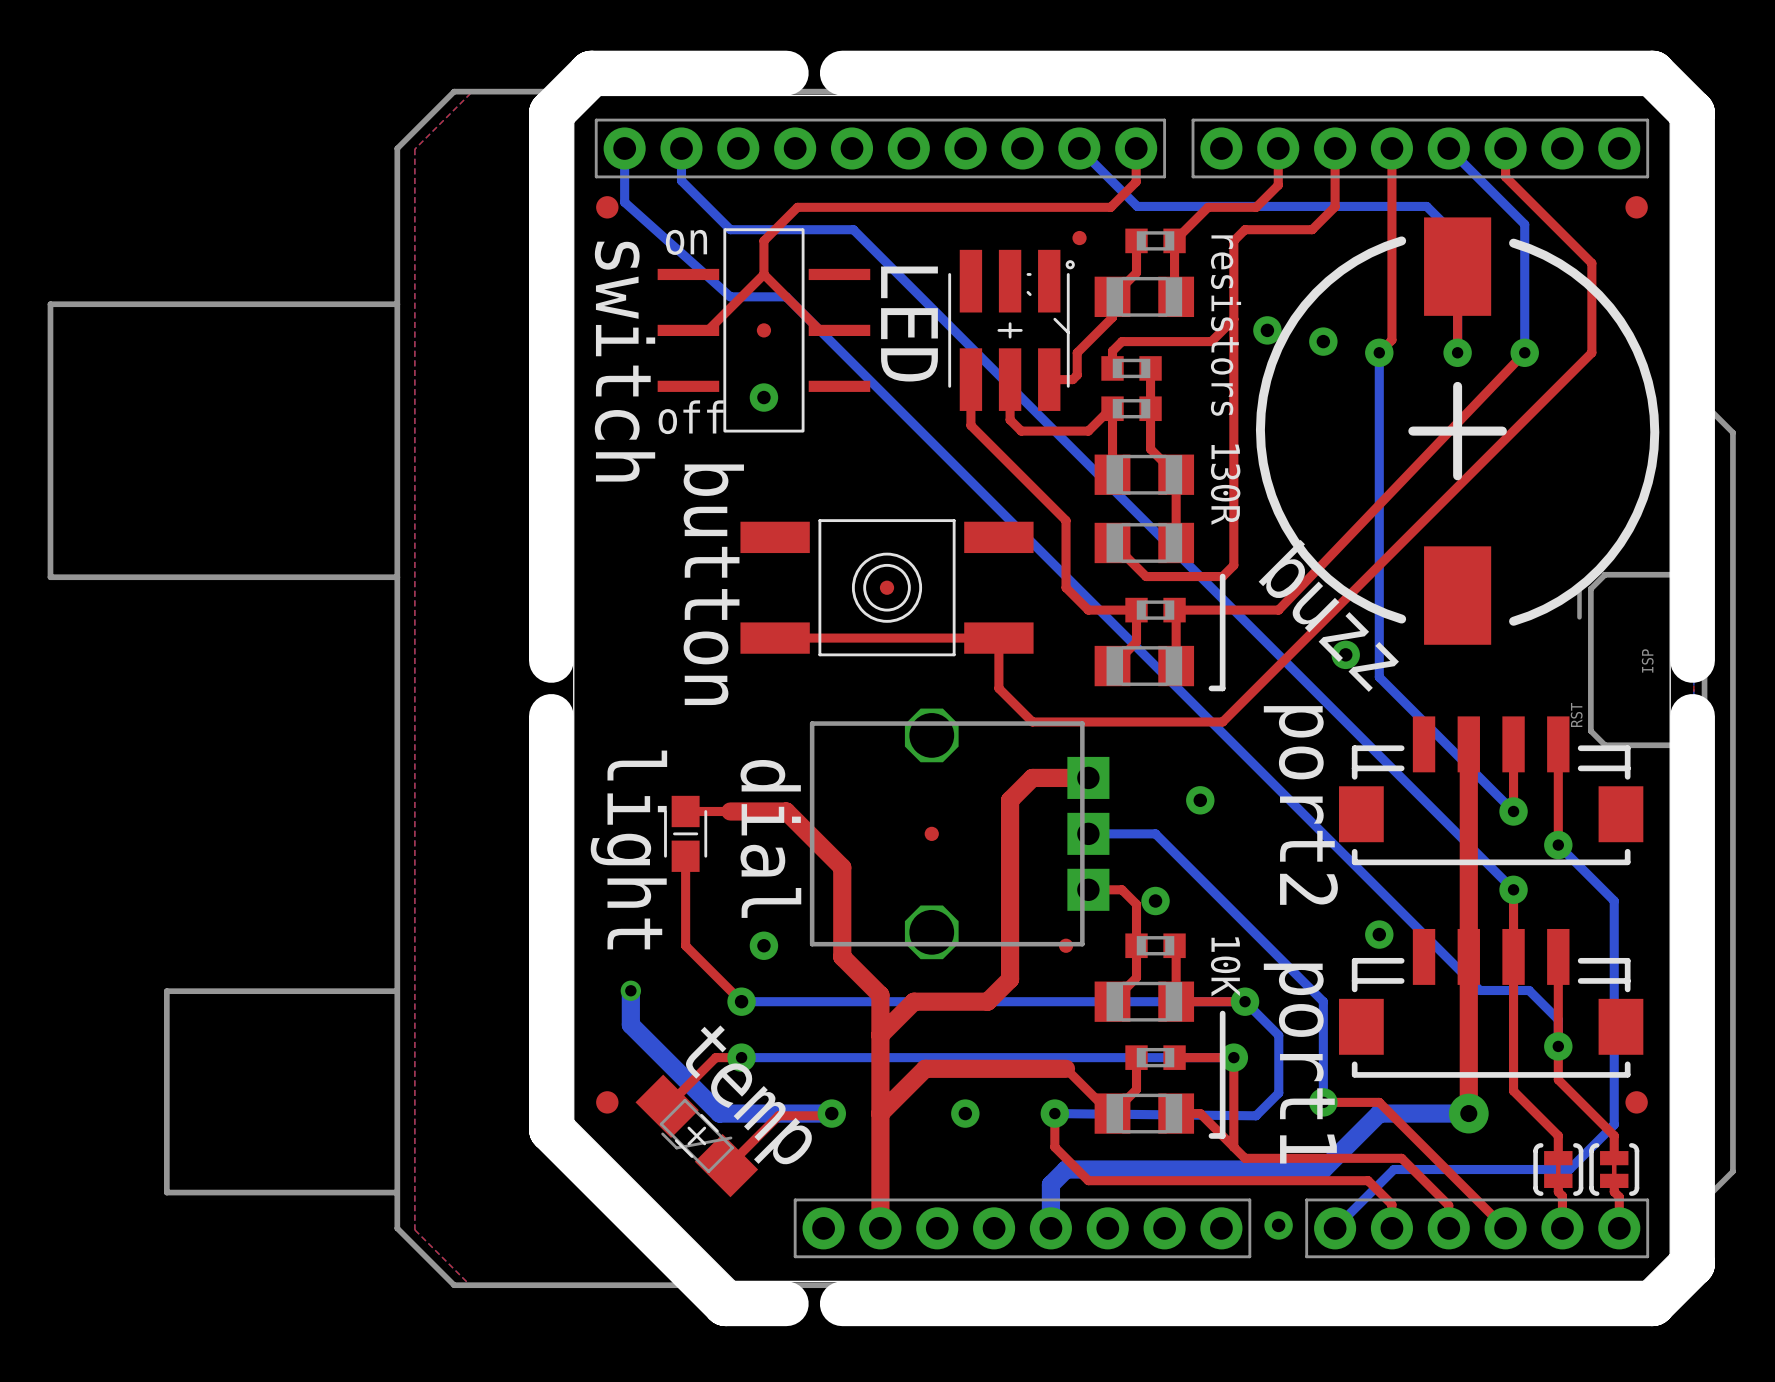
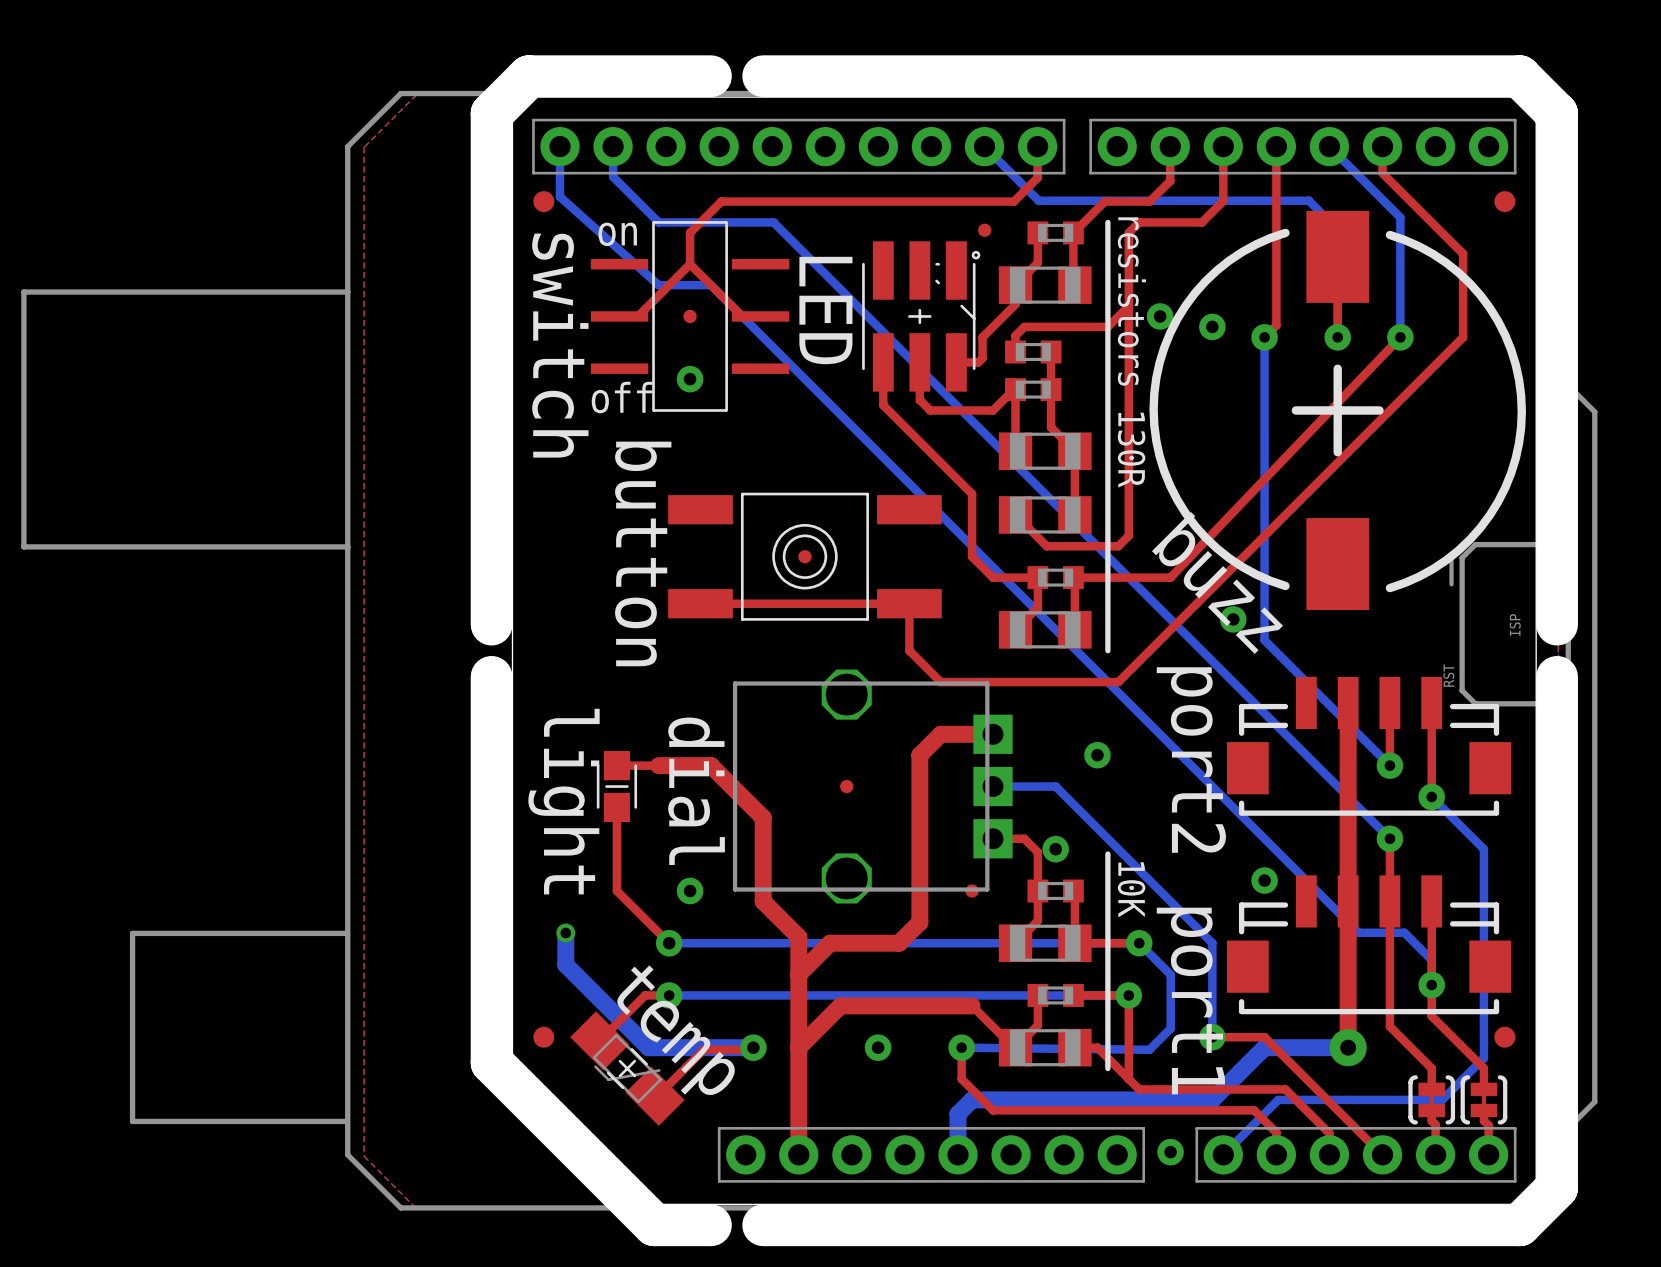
text position: resistors 130R (1226, 380) -> resistors 130R (1131, 352)
line: (1222, 576) (1222, 688) (1211, 688) -> (1107, 222) (1107, 650)
text position: 10K (1225, 966) -> 10K (1131, 889)
line: (1222, 1013) (1222, 1135) (1211, 1135) -> (1107, 854) (1107, 1068)

